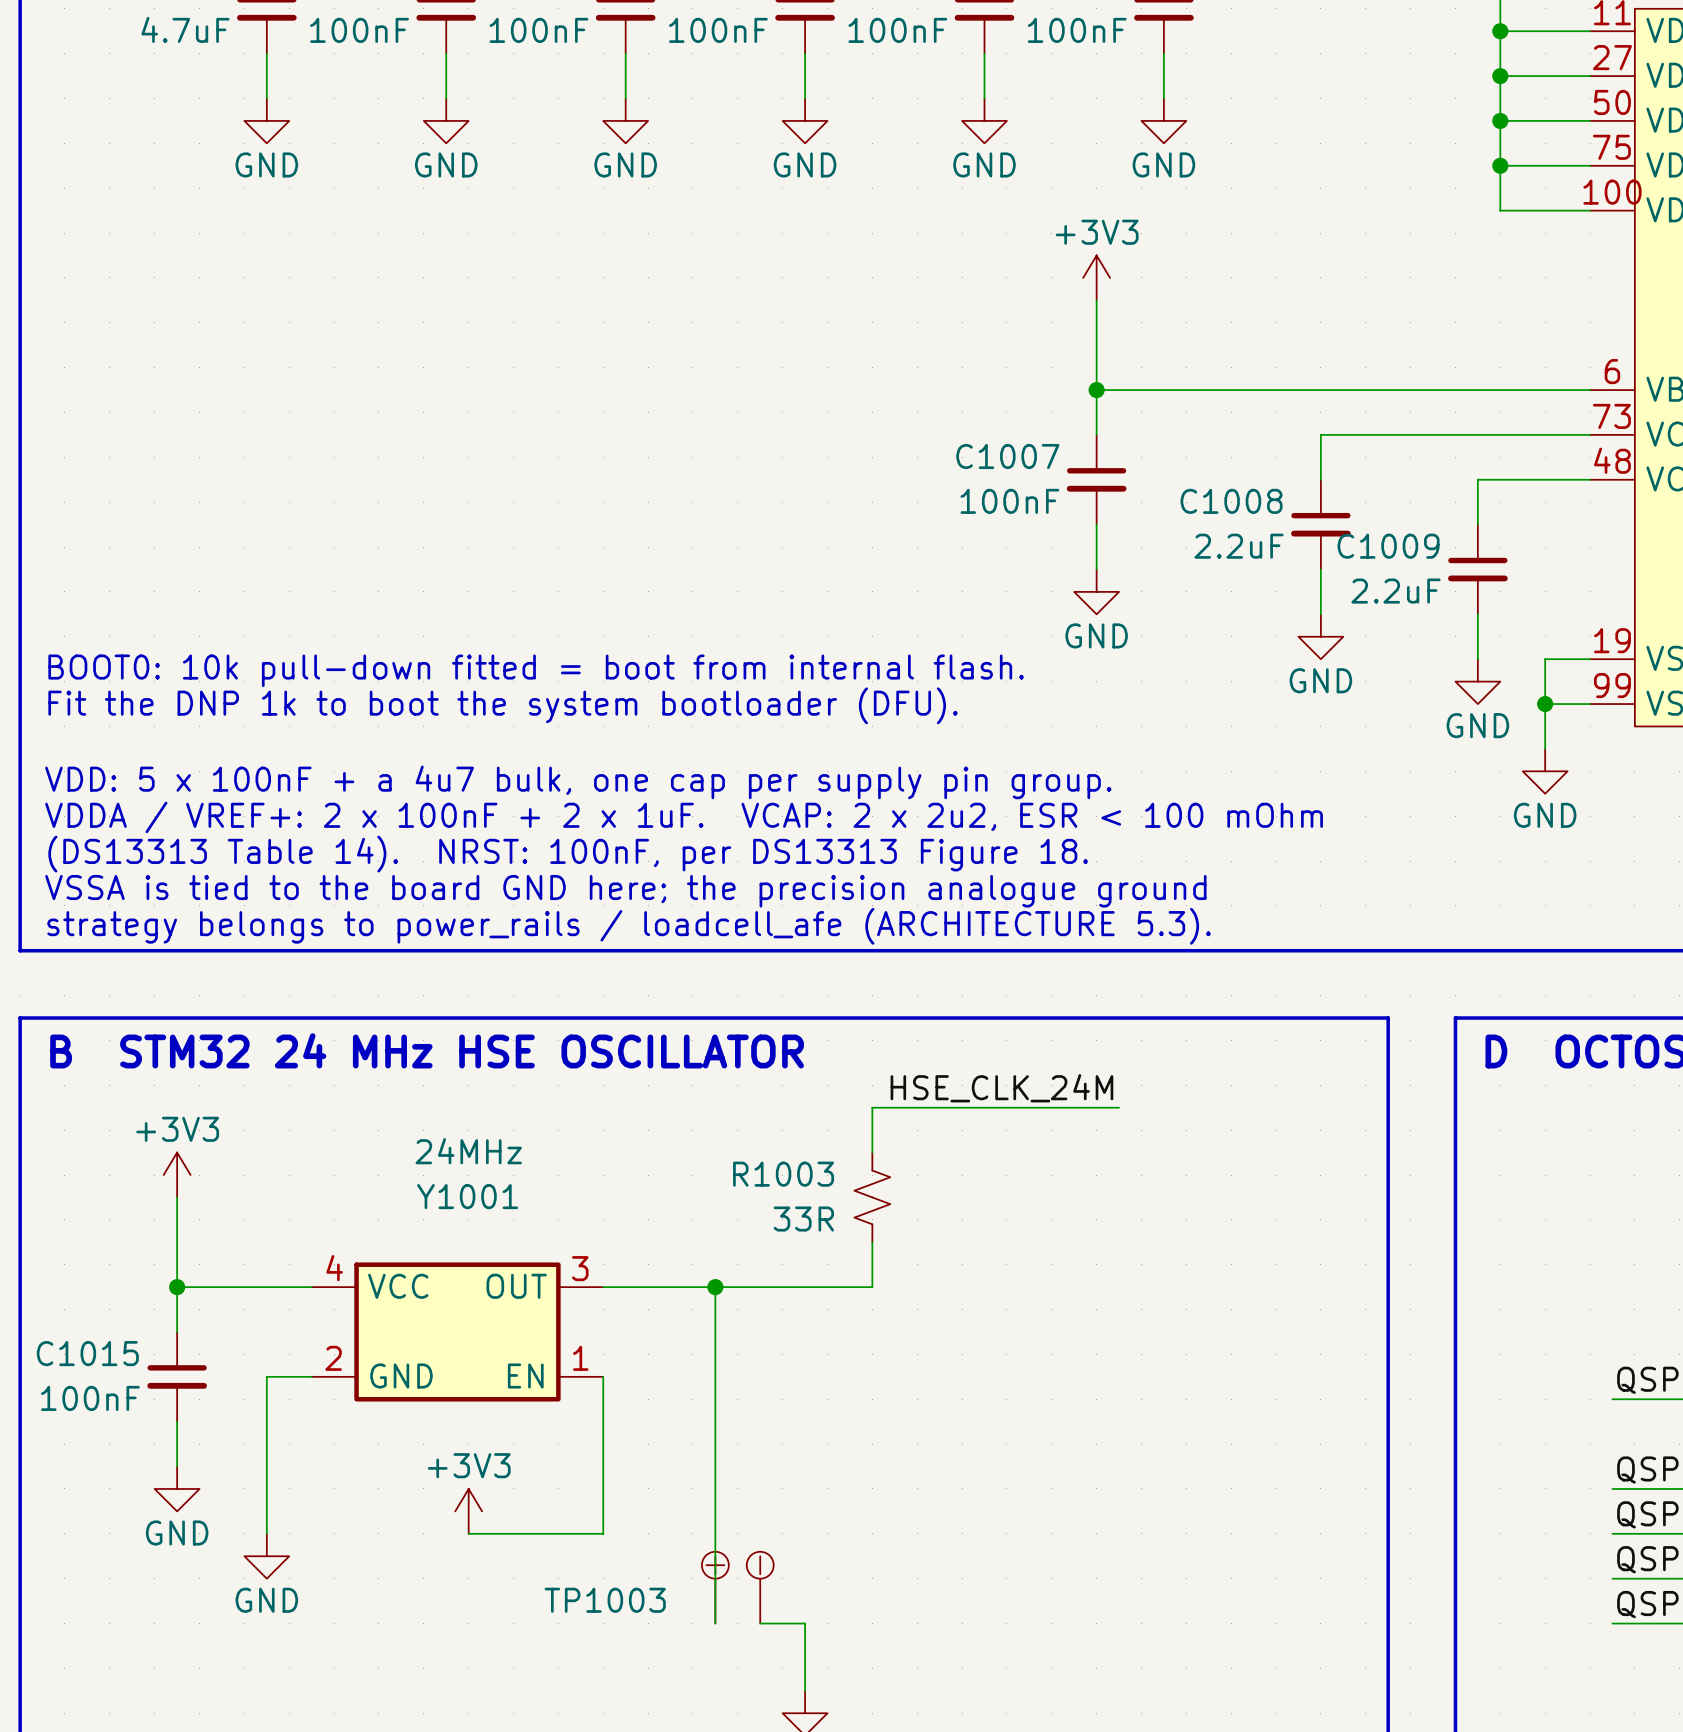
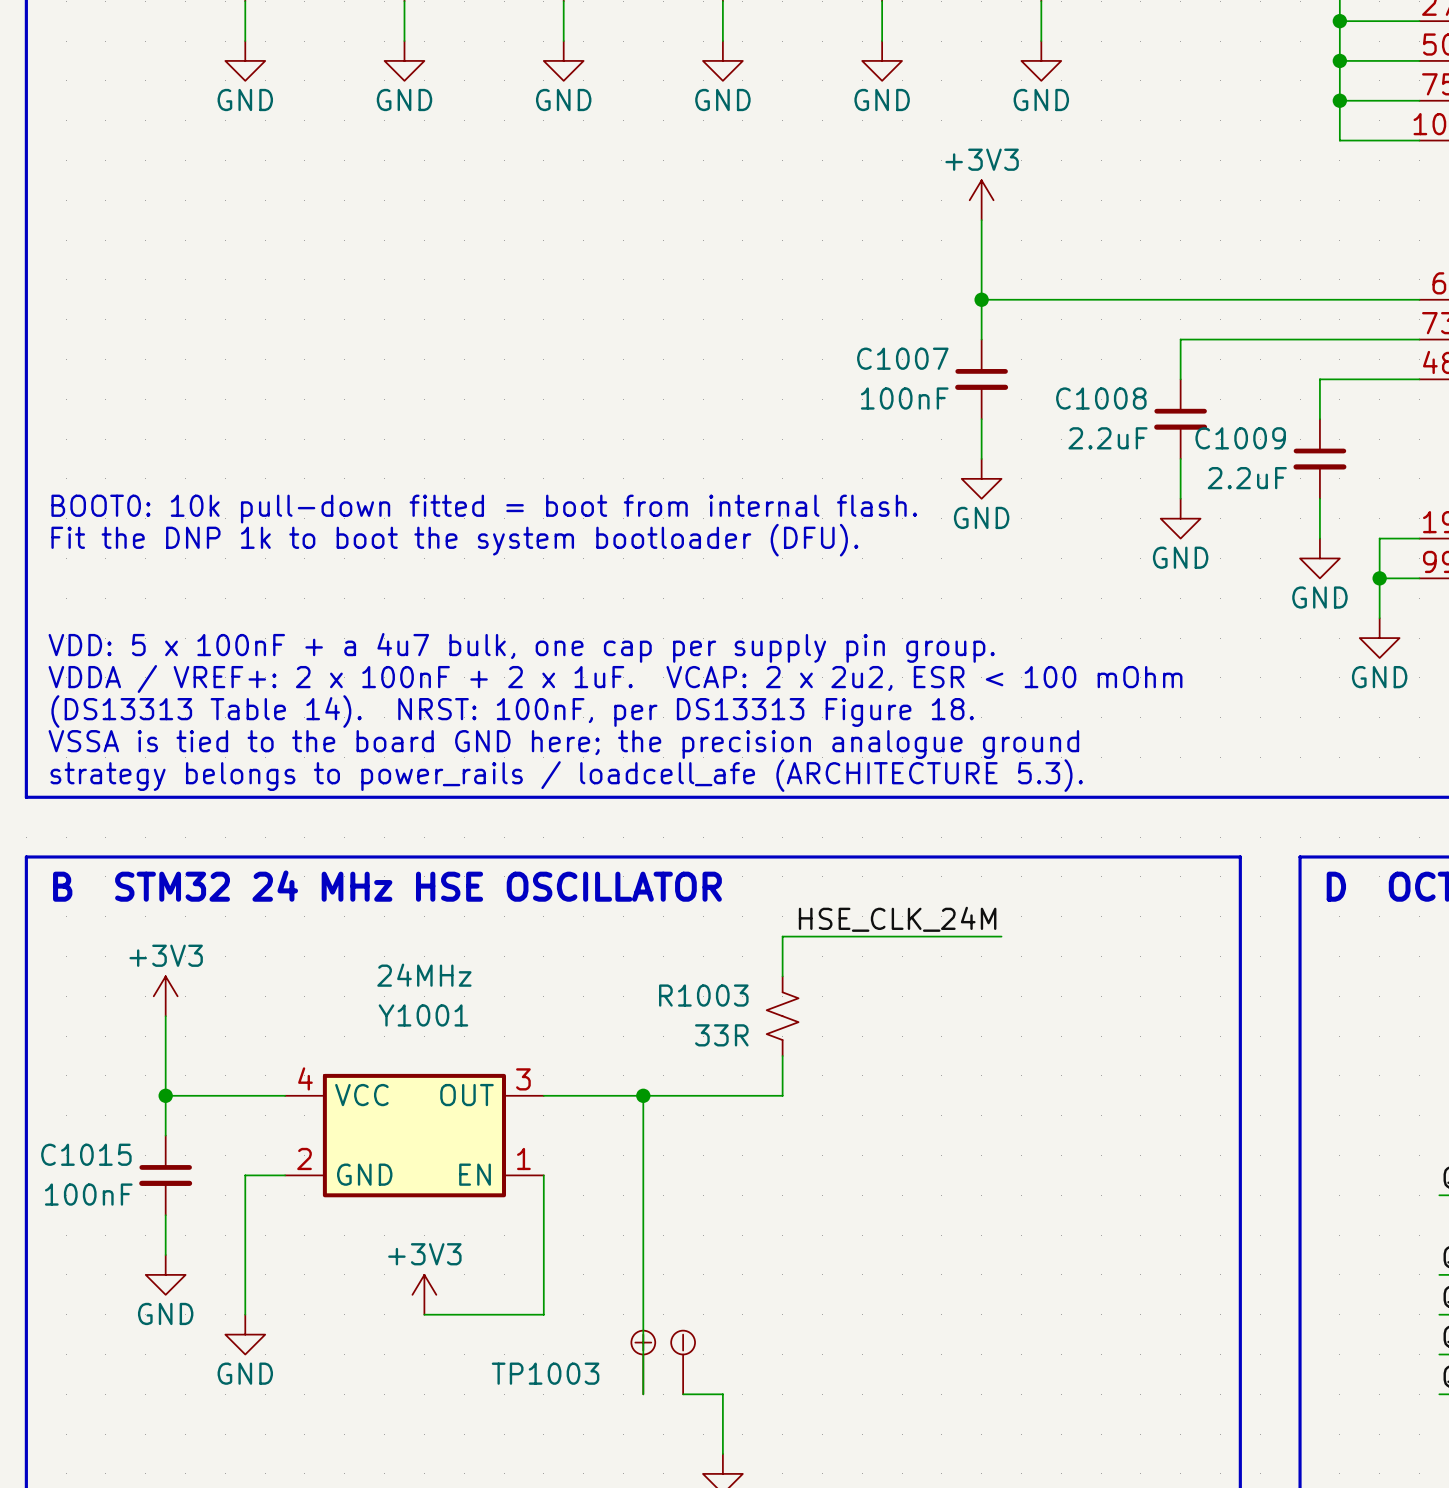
text: none -> BOOT0: 10k pull-down fitted = boot from internal flash. (484, 509)
text: BOOT0: 10k pull-down fitted = boot from internal flash. (536, 670) -> Fit the DNP 1k to boot the system bootloader (DFU). (454, 540)
text: Fit the DNP 1k to boot the system bootloader (DFU). (503, 705) -> none

